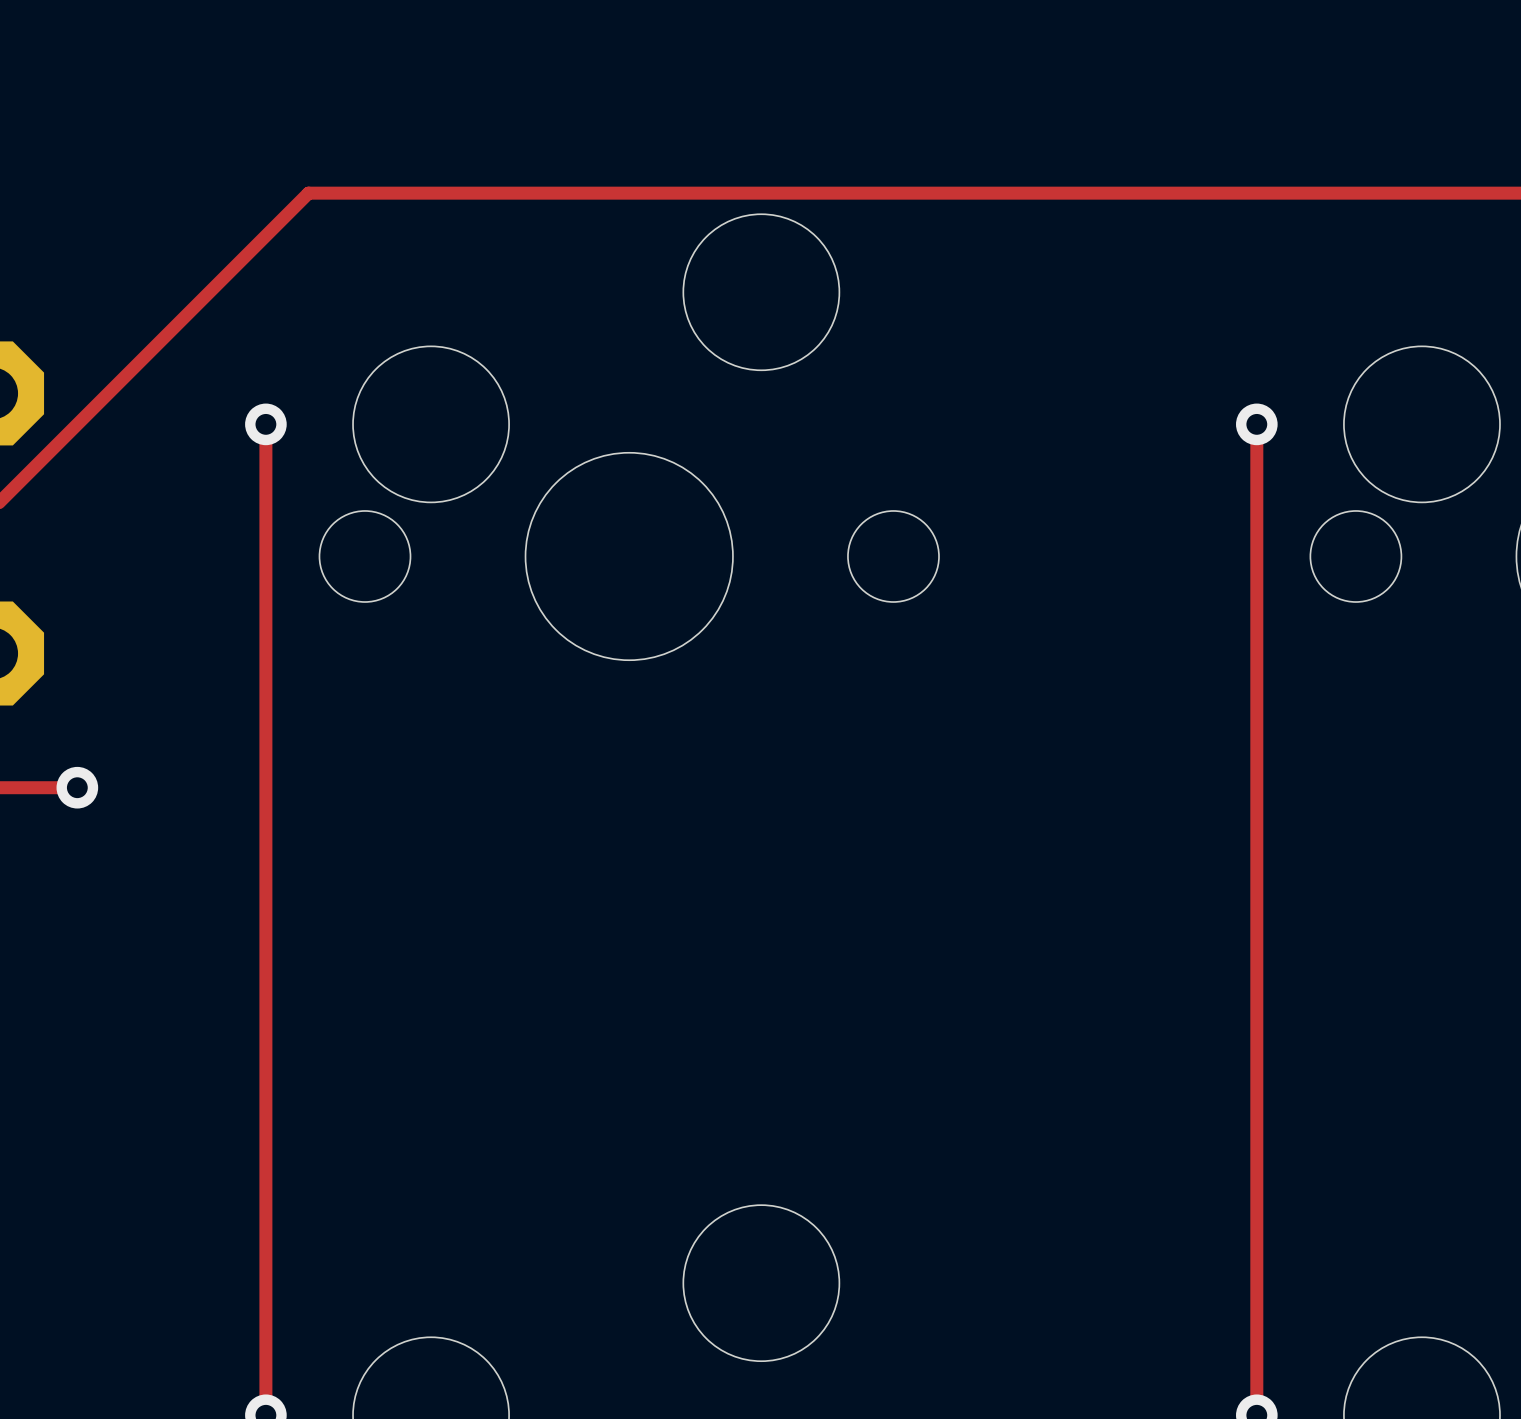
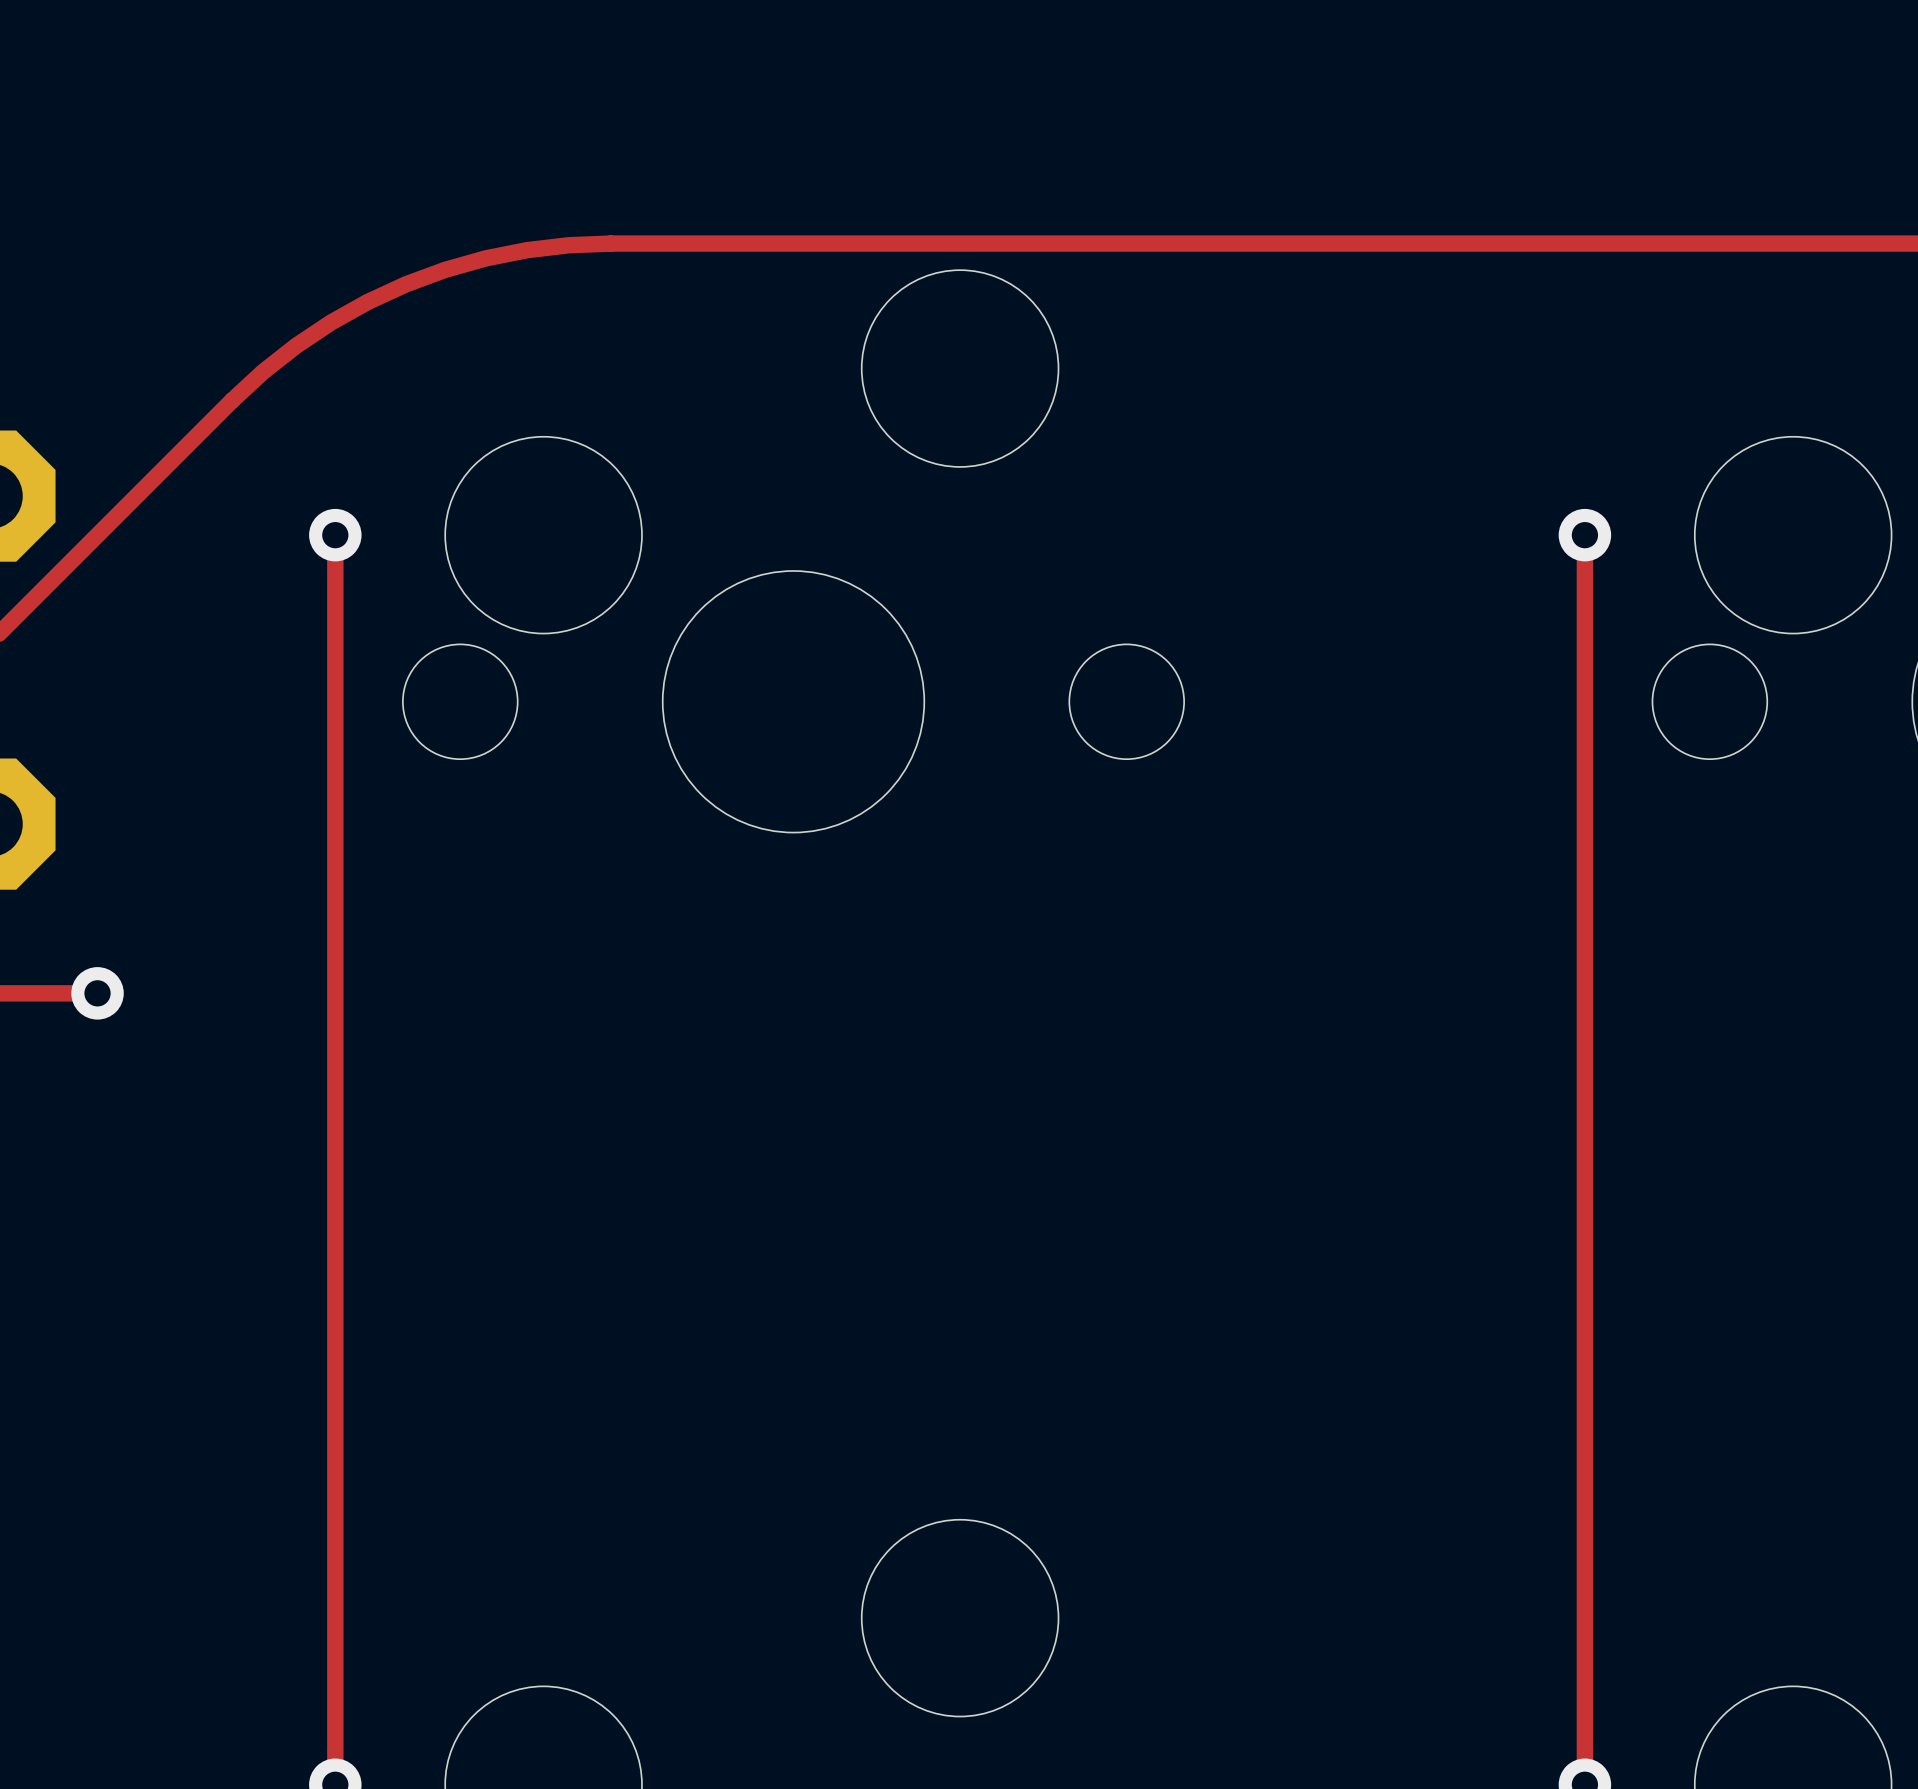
track: (484, 193) (308, 193) (184, 317) -> (610, 243) (568, 245) (527, 250) (485, 258) (445, 269) (405, 284) (367, 301) (331, 322) (296, 345) (263, 371) (232, 400)

